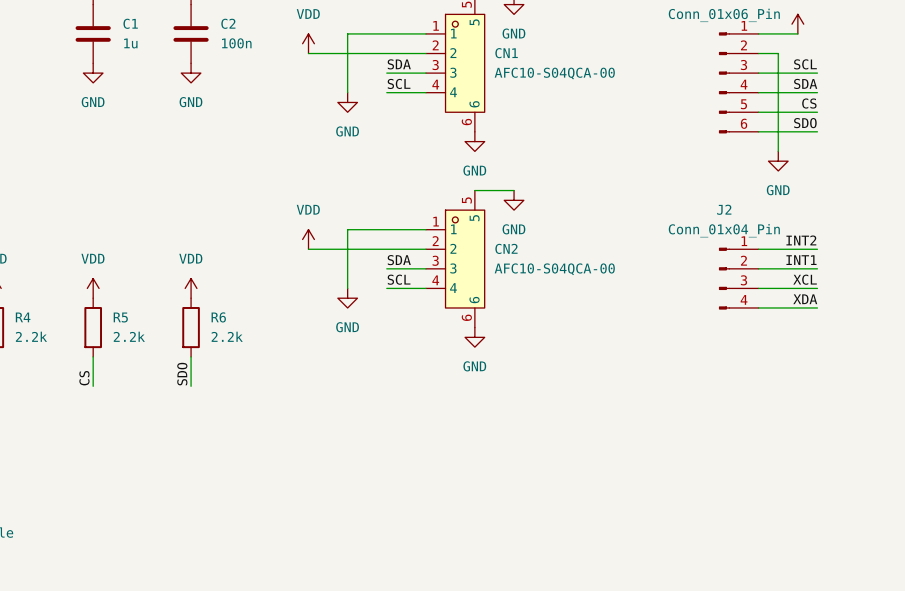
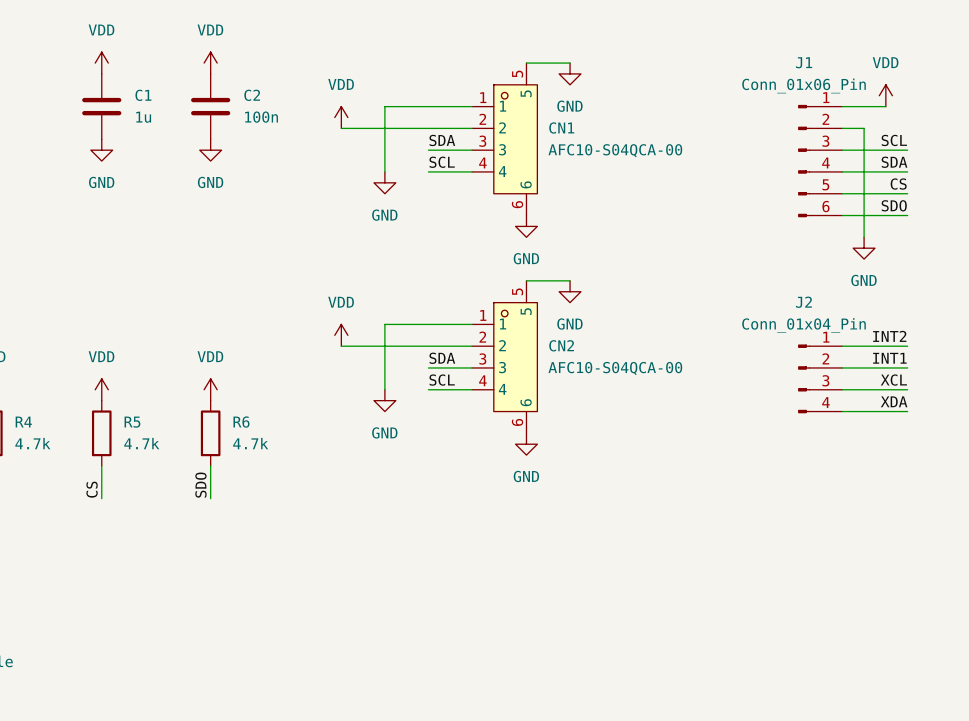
R4 value: 2.2k (31, 336) -> 4.7k (32, 443)
R5 value: 2.2k (129, 336) -> 4.7k (141, 443)
R6 value: 2.2k (227, 336) -> 4.7k (250, 443)

